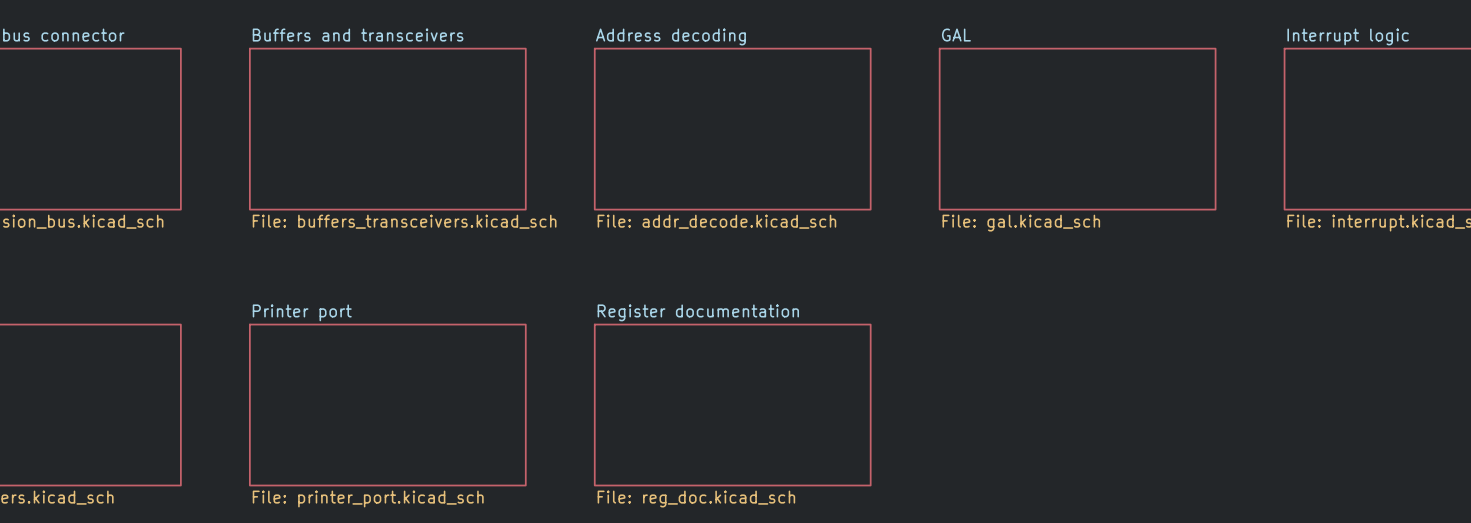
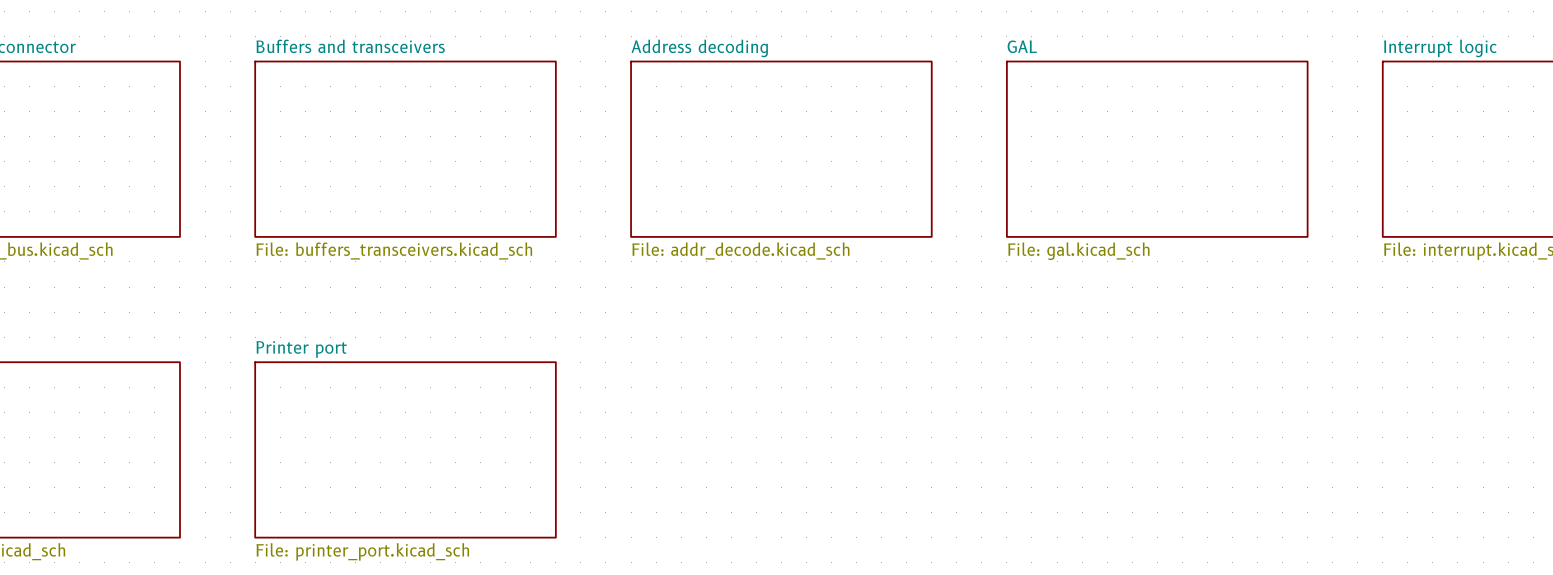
sheet Register documentation: File: reg_doc.kicad_sch (732, 405) -> none

